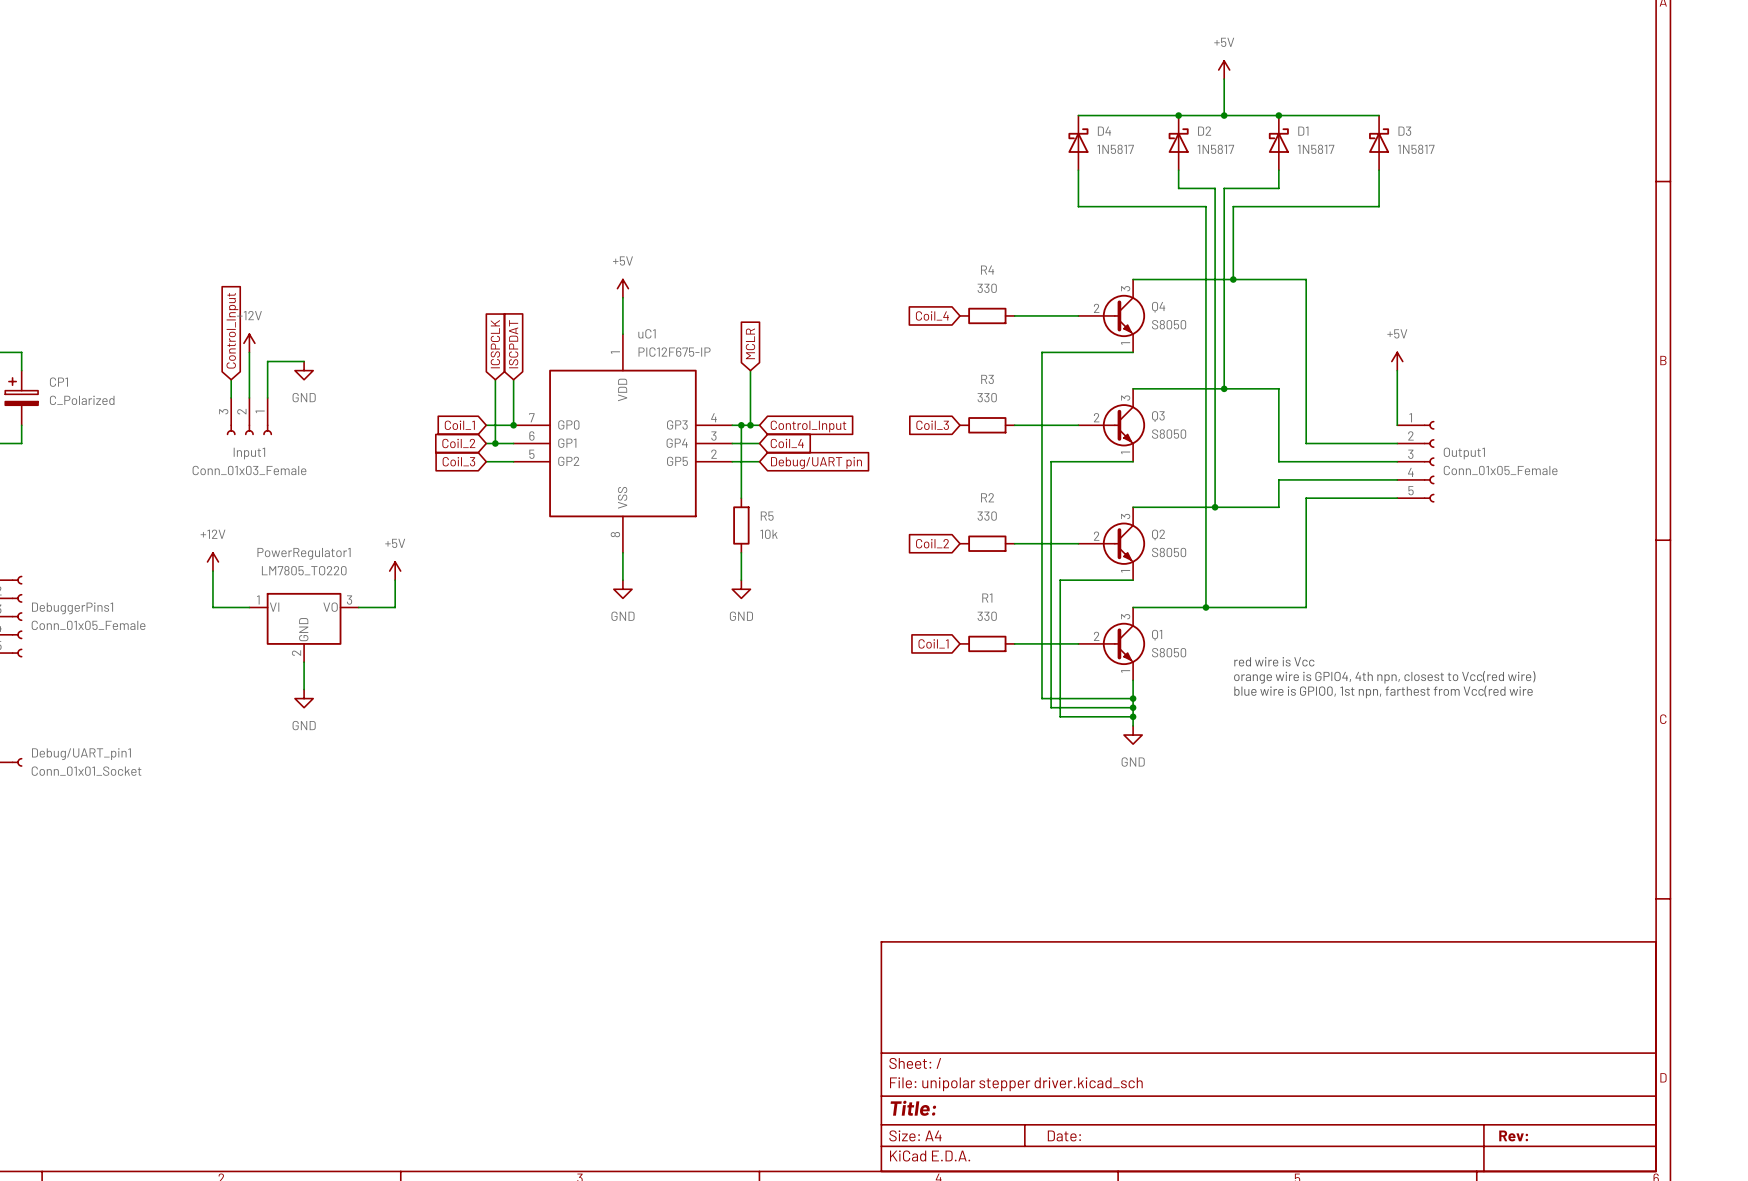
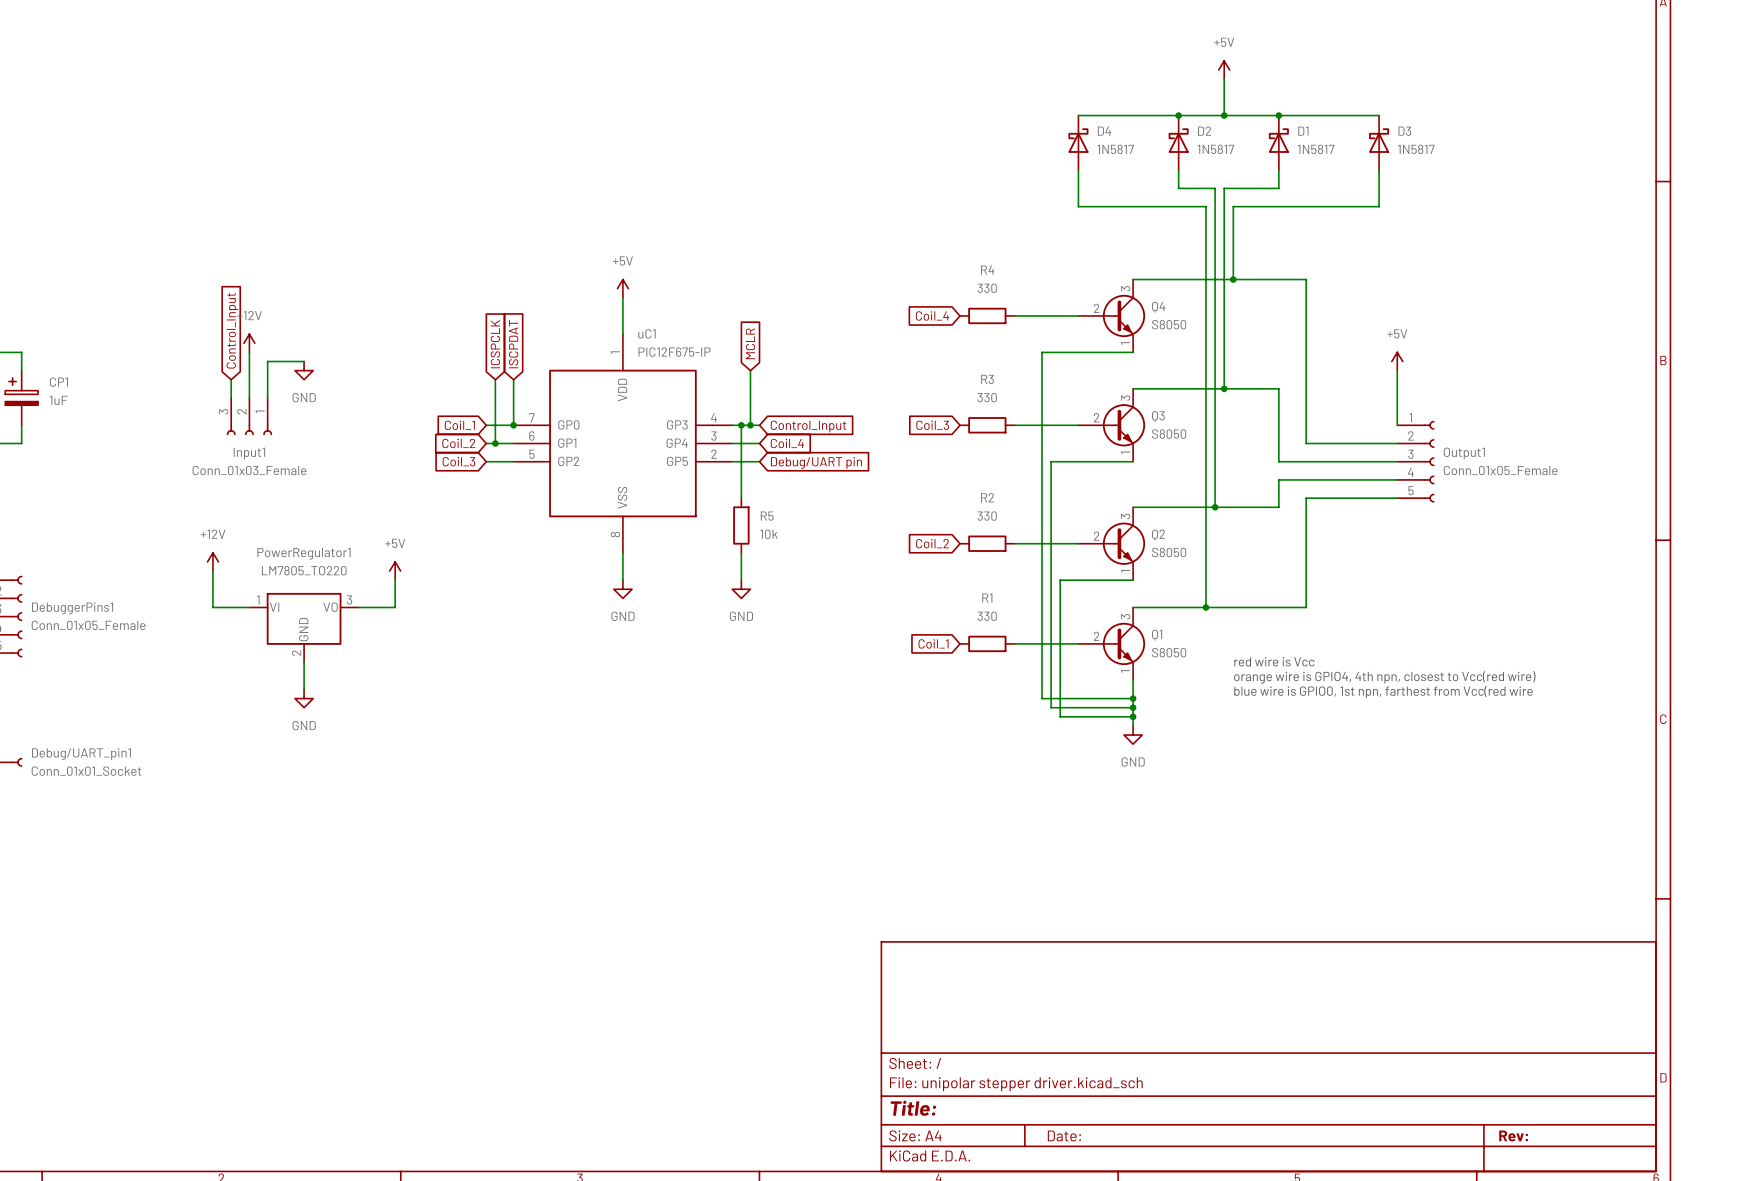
CP1 value: C_Polarized (82, 400) -> 1uF (58, 400)

